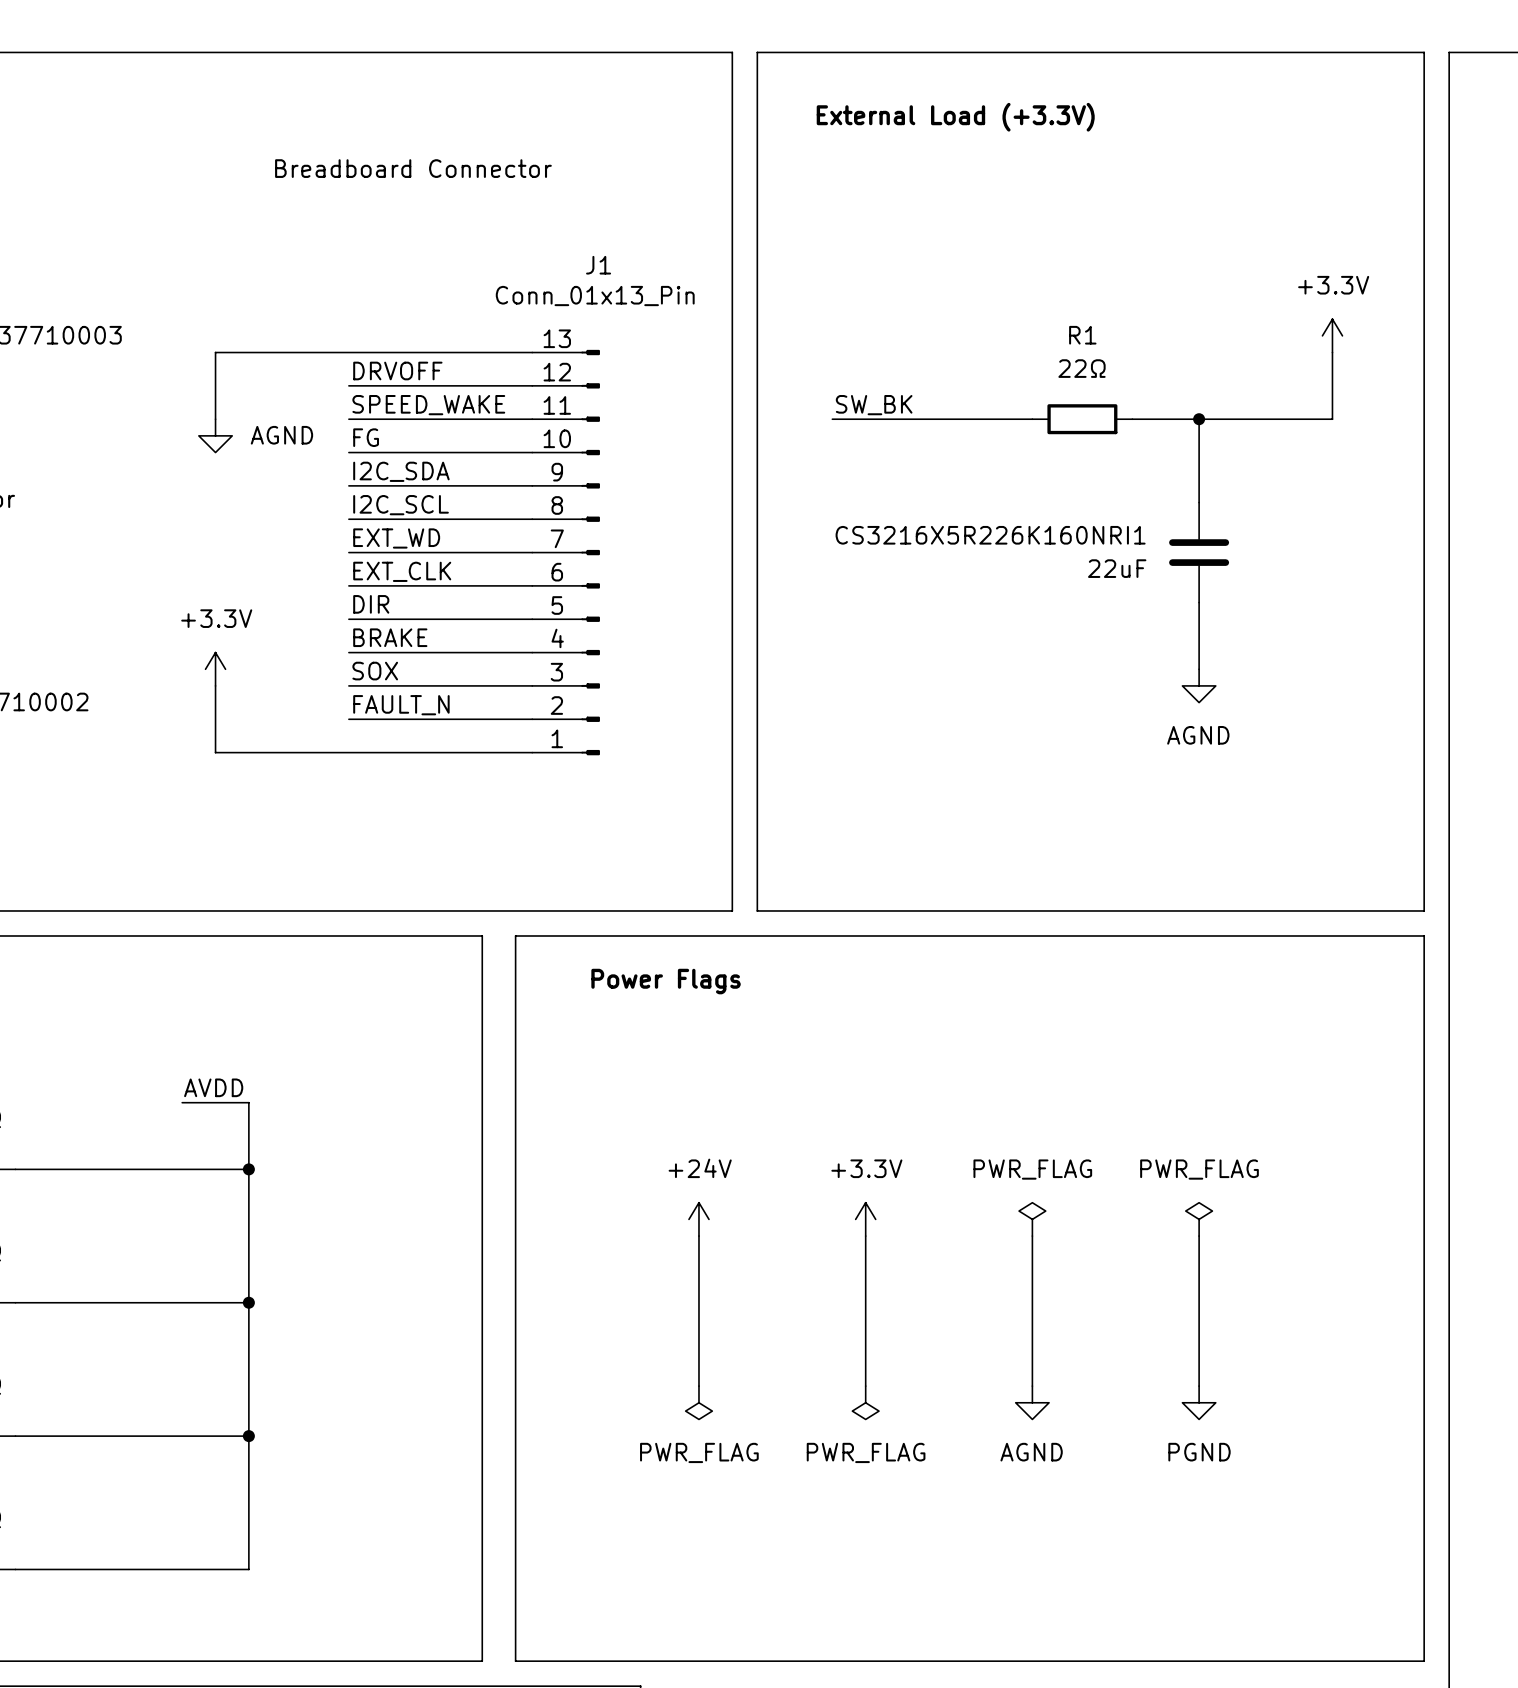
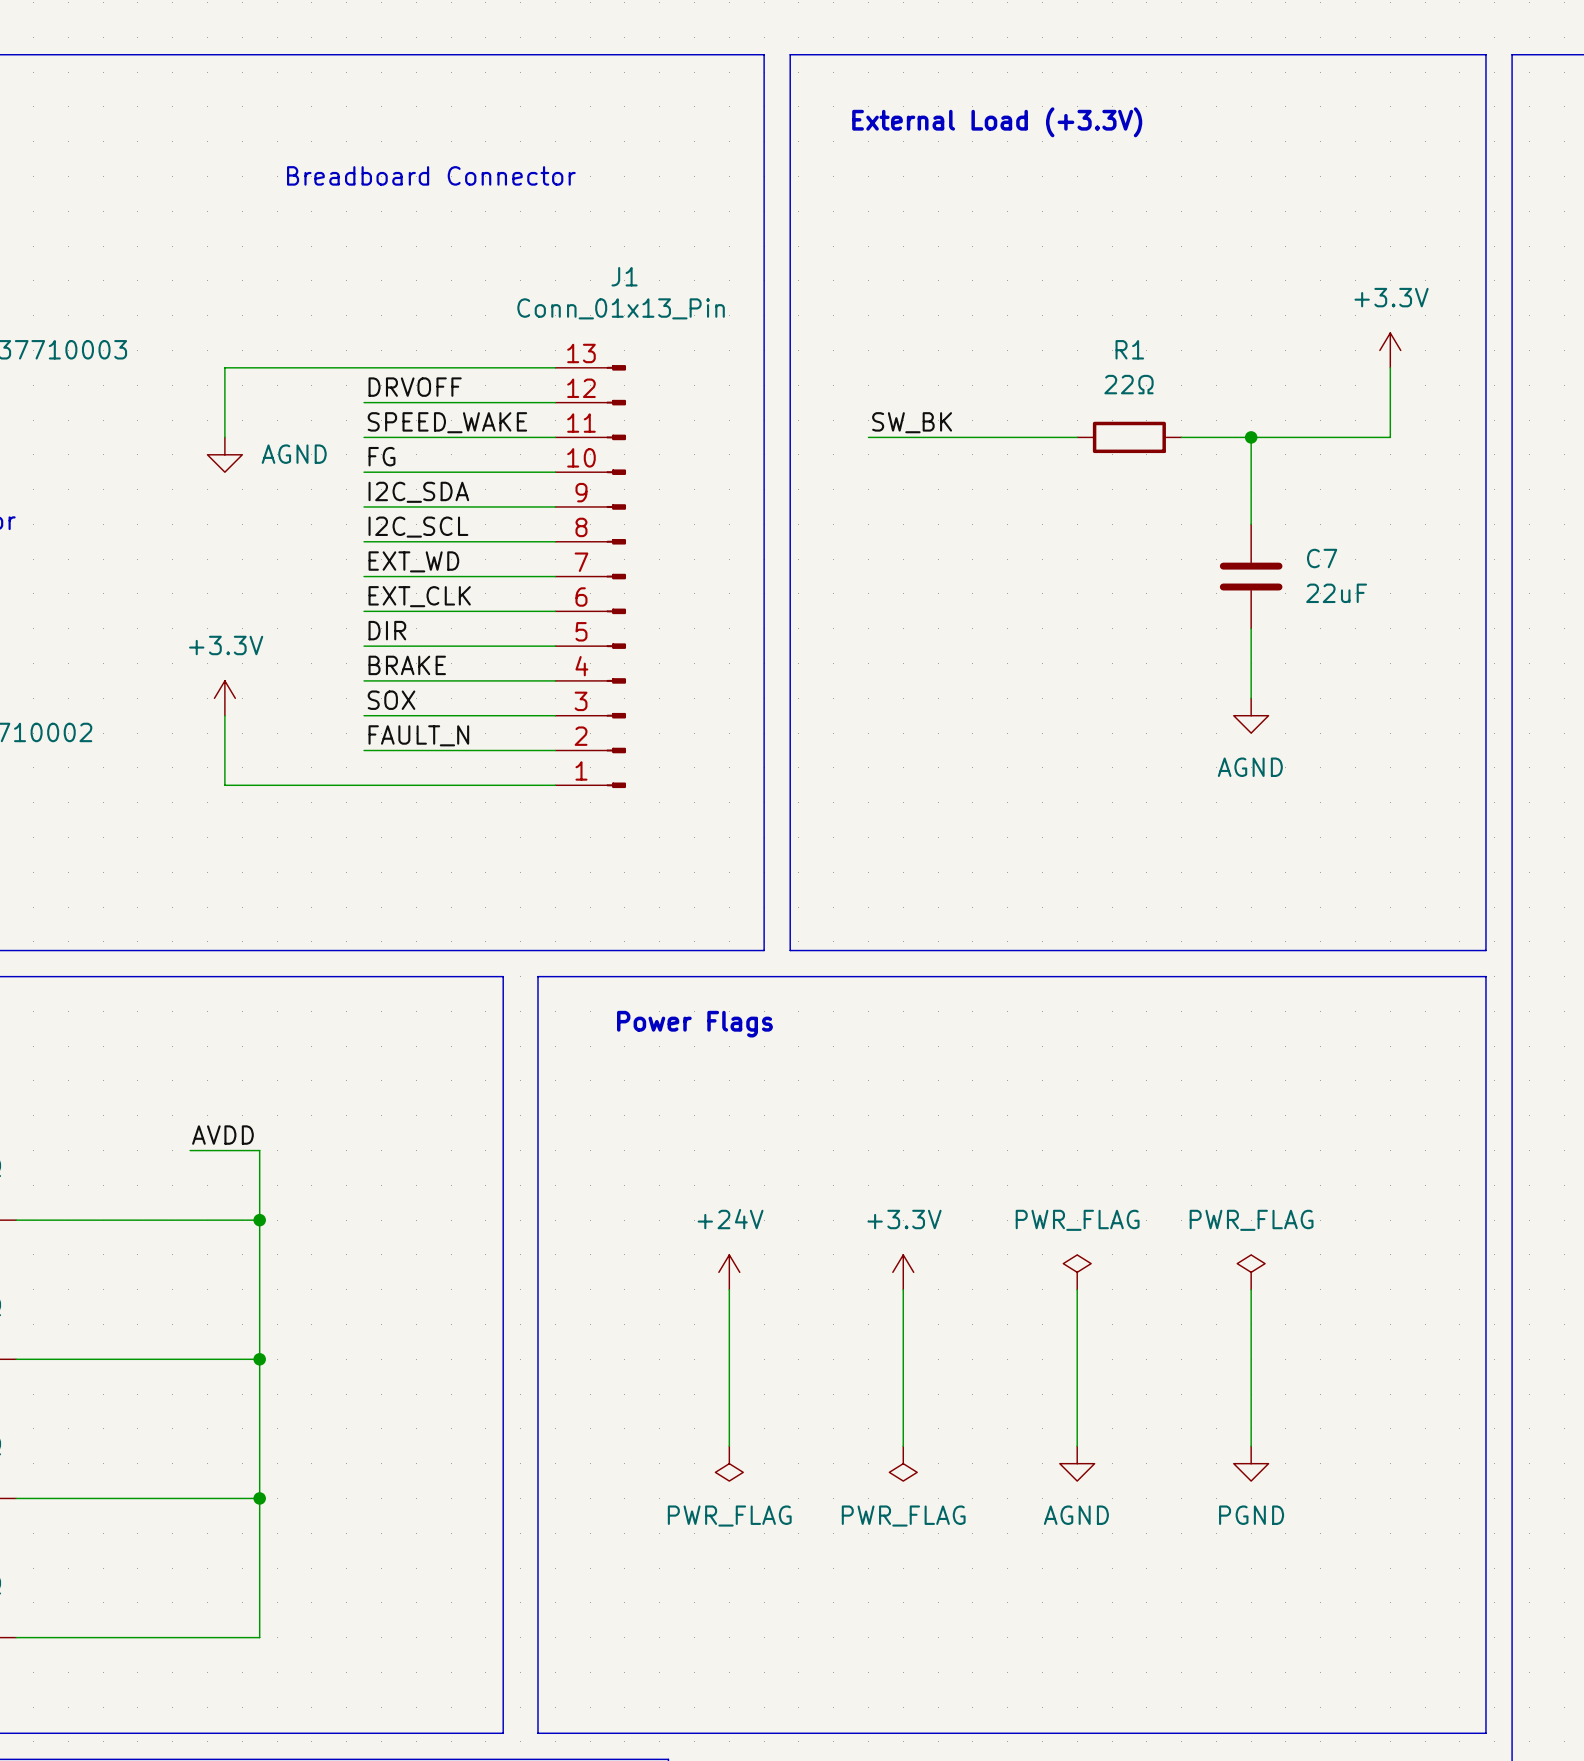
CS3216X5R226K160NRI1 name: CS3216X5R226K160NRI1 (990, 535) -> C7 (1322, 558)
CS3216X5R226K160NRI1 value position: 22uF (1117, 568) -> 22uF (1336, 593)

